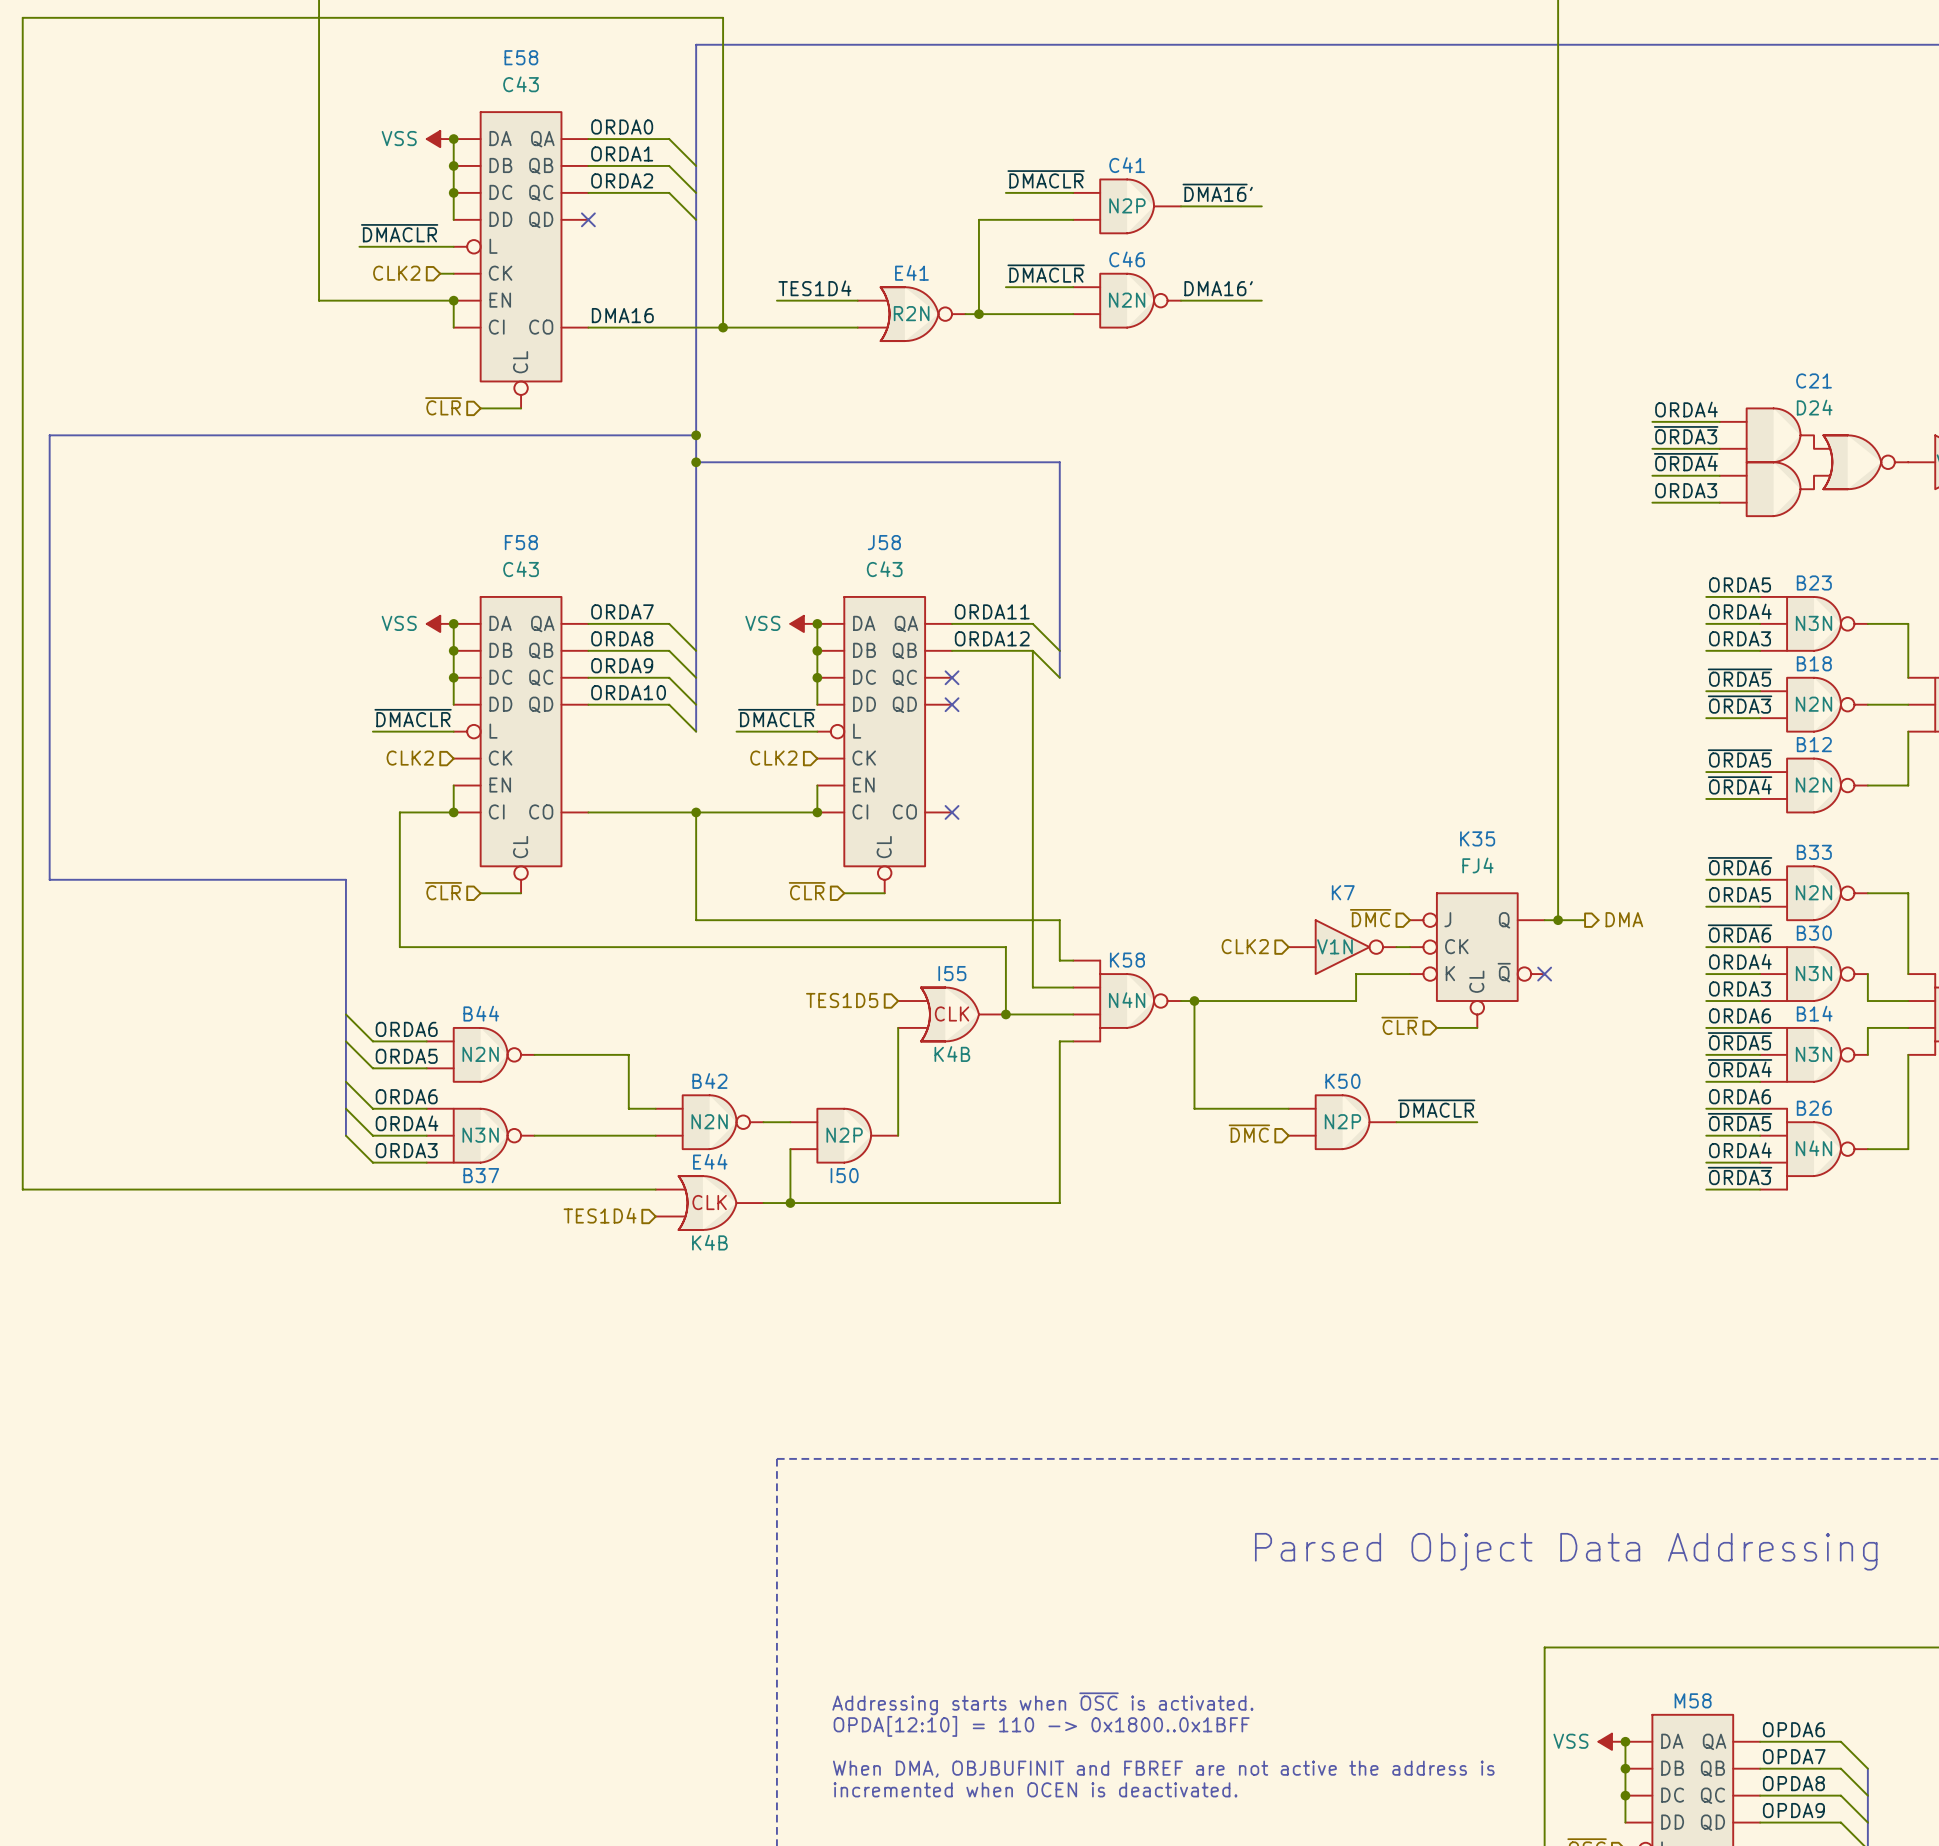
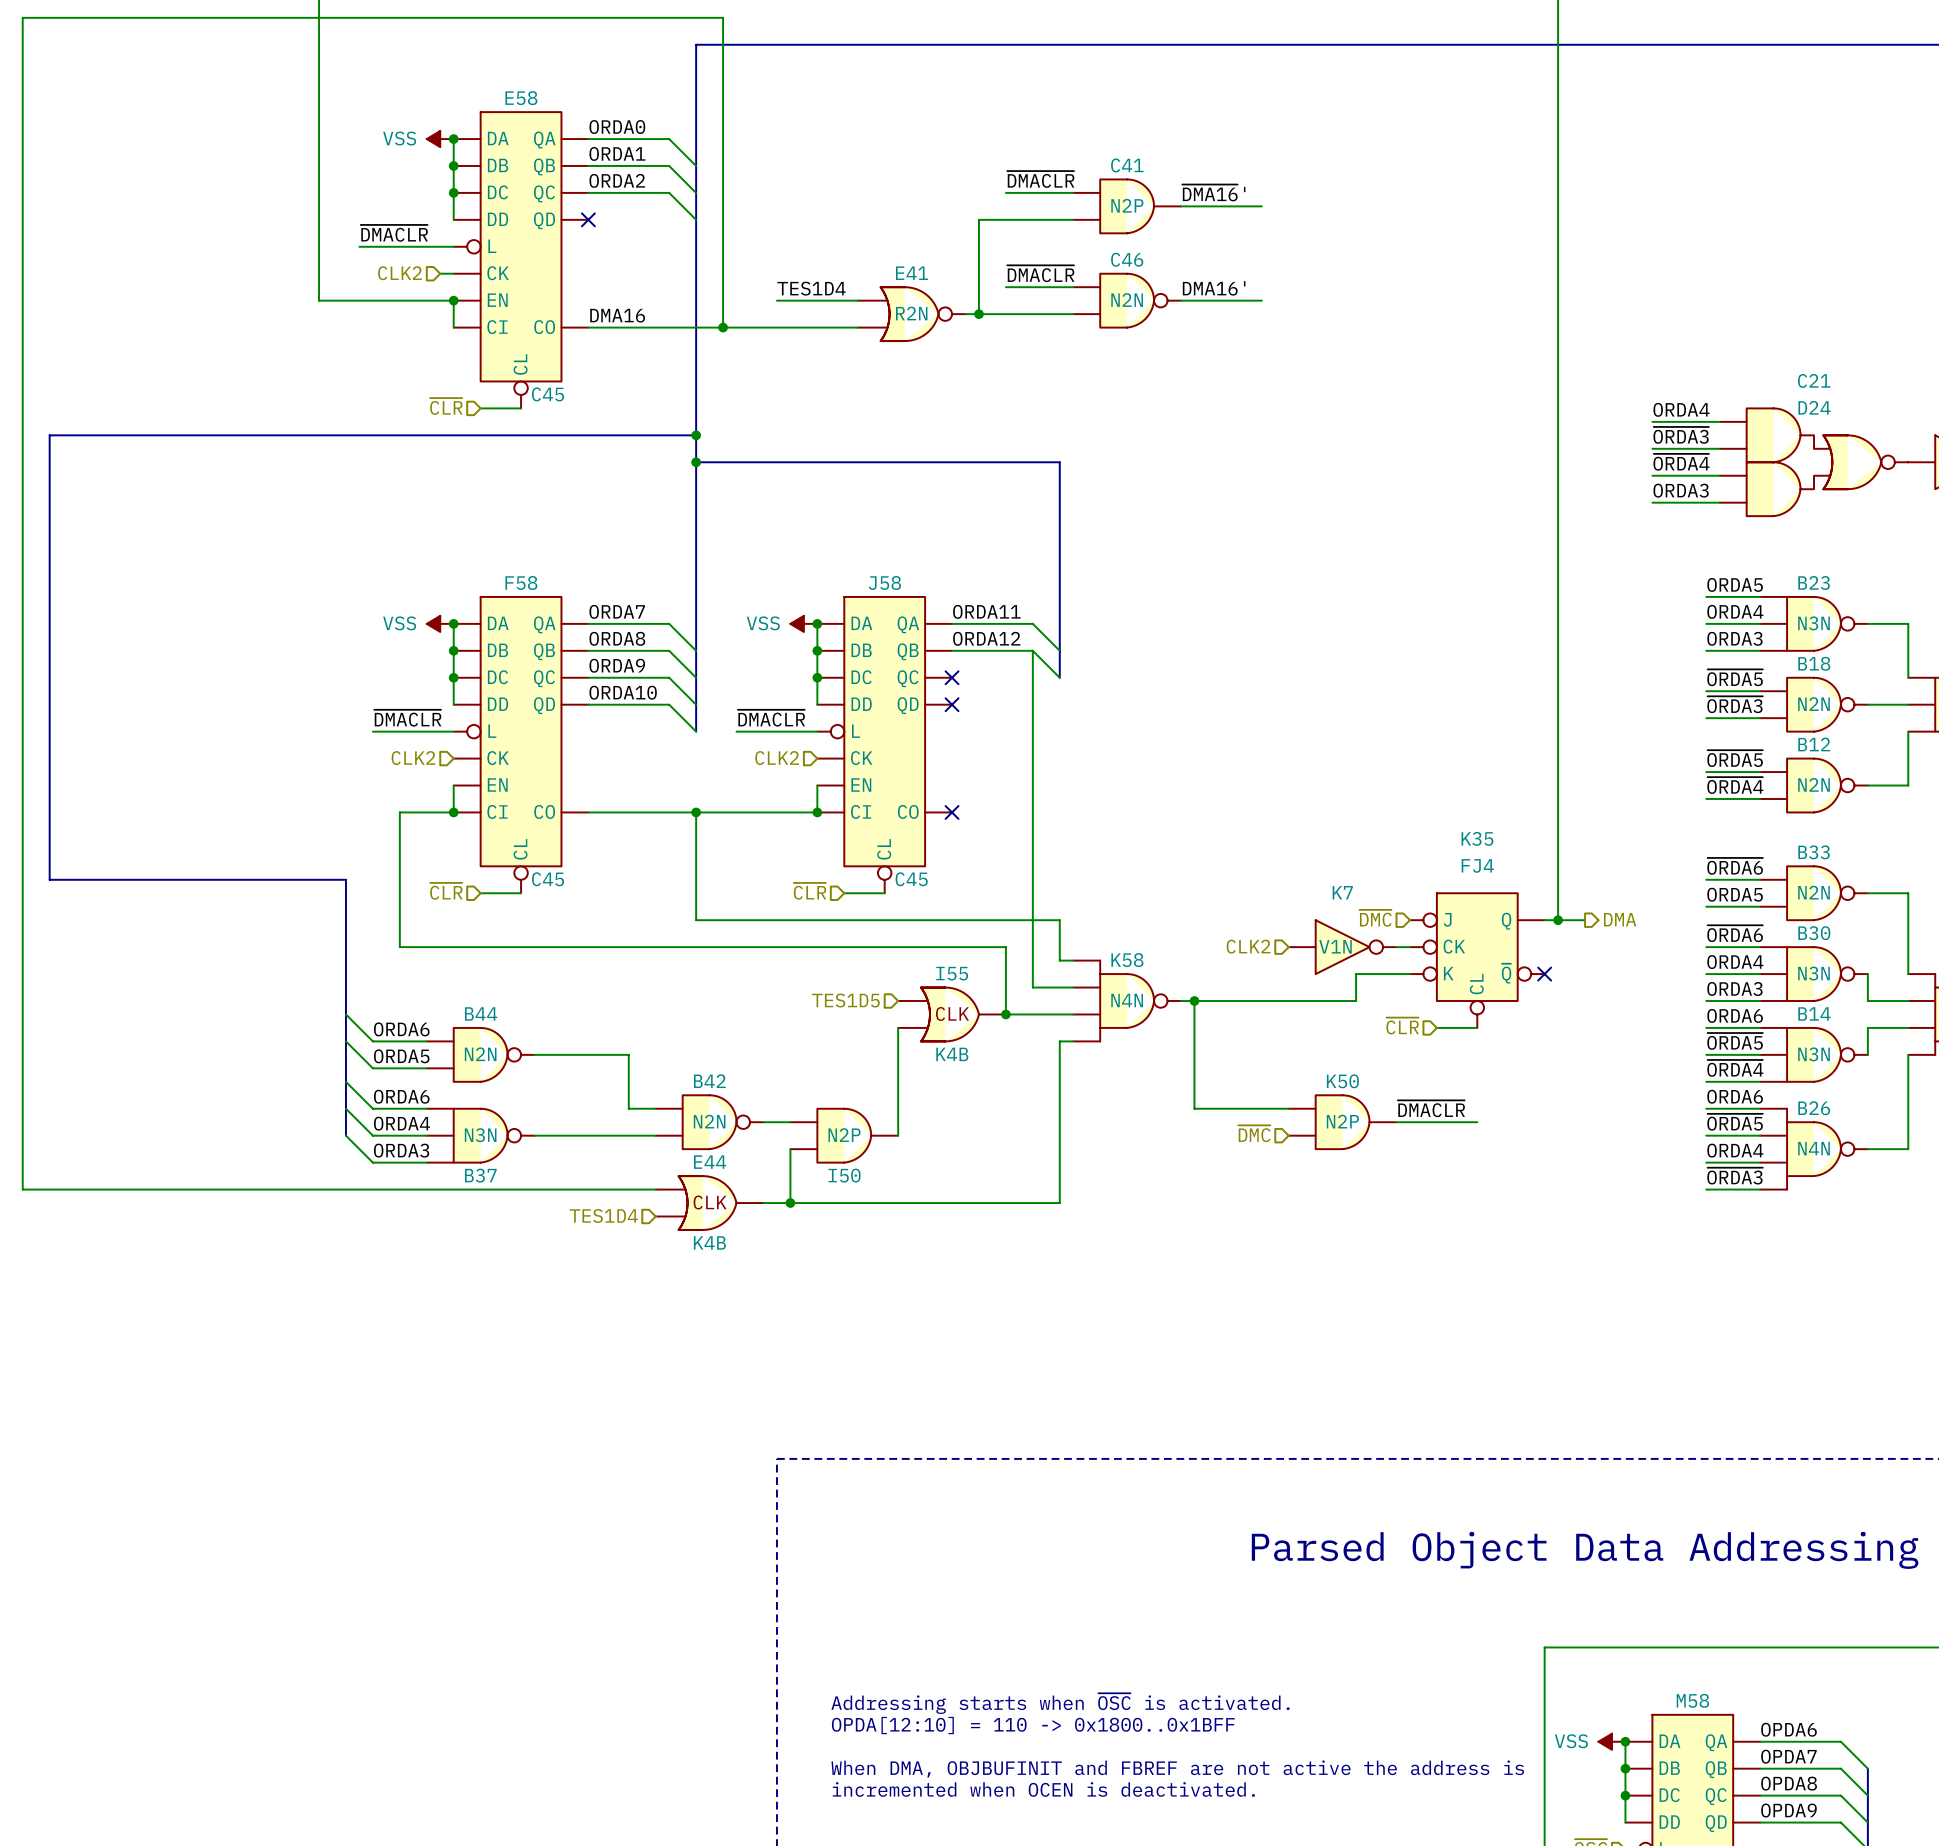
E58 name position: E58 (521, 57) -> E58 (521, 98)
E58 value: C43 (521, 84) -> C45 (548, 394)
F58 name position: F58 (521, 542) -> F58 (521, 582)
J58 name position: J58 (884, 542) -> J58 (884, 582)
F58 value: C43 (521, 569) -> C45 (548, 879)
J58 value: C43 (884, 569) -> C45 (911, 879)

